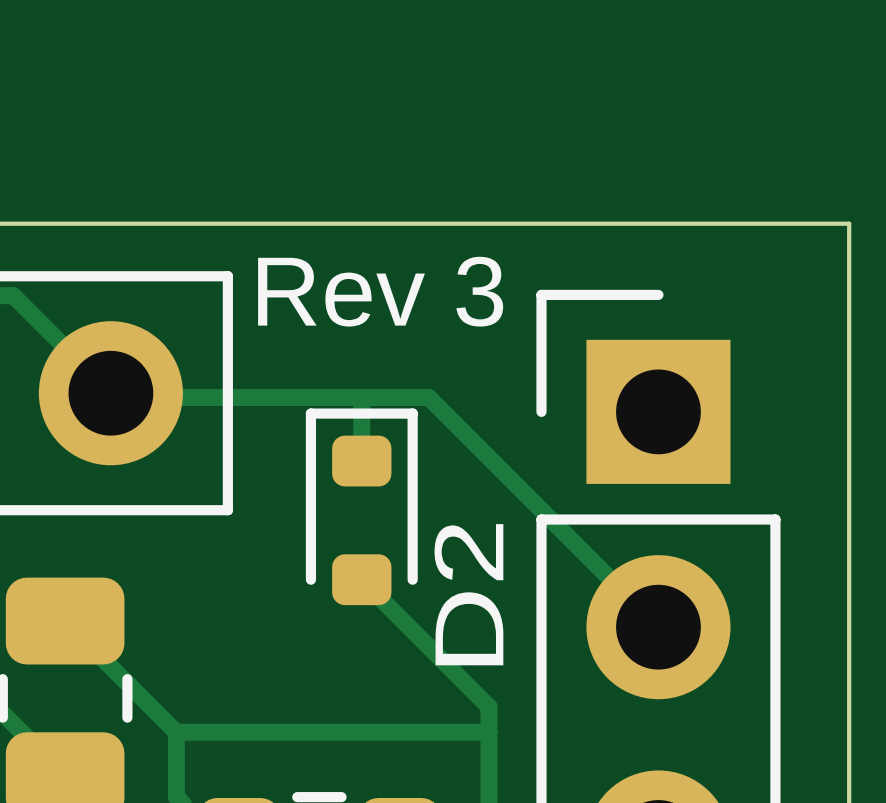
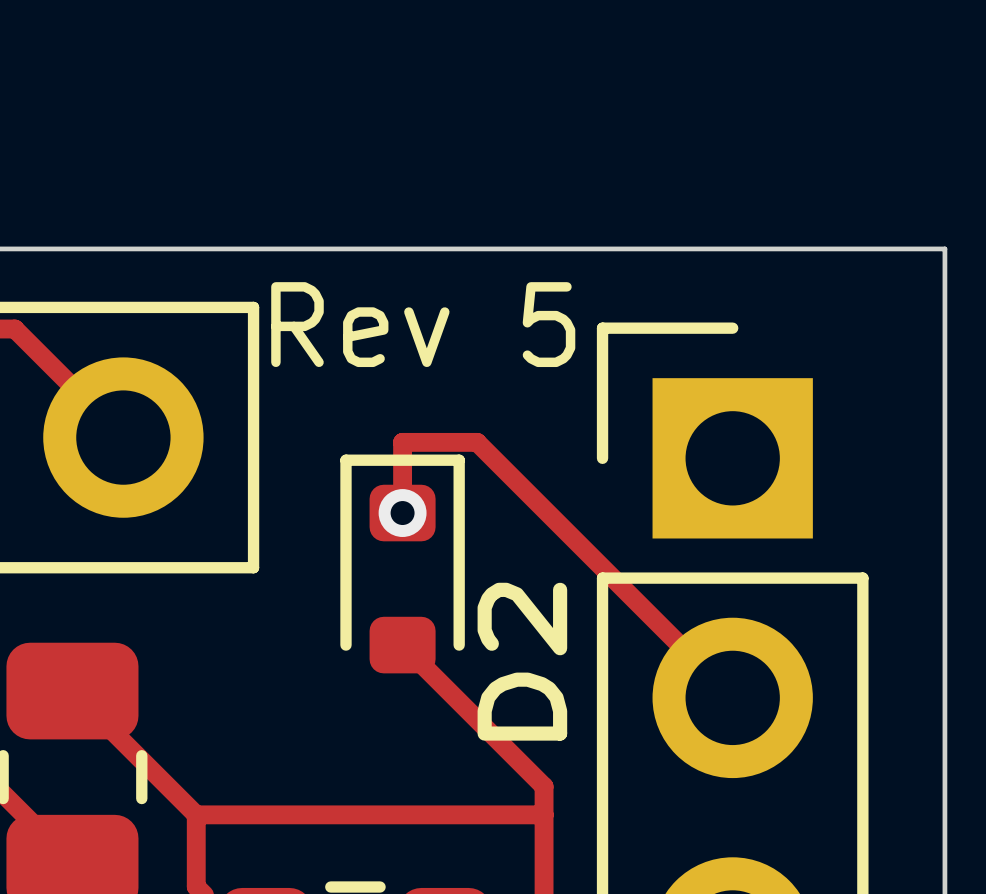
text: Rev 3 (380, 291) -> Rev 5 (423, 324)
track: (103, 397) (361, 397) -> none
via: none -> (402, 513)

